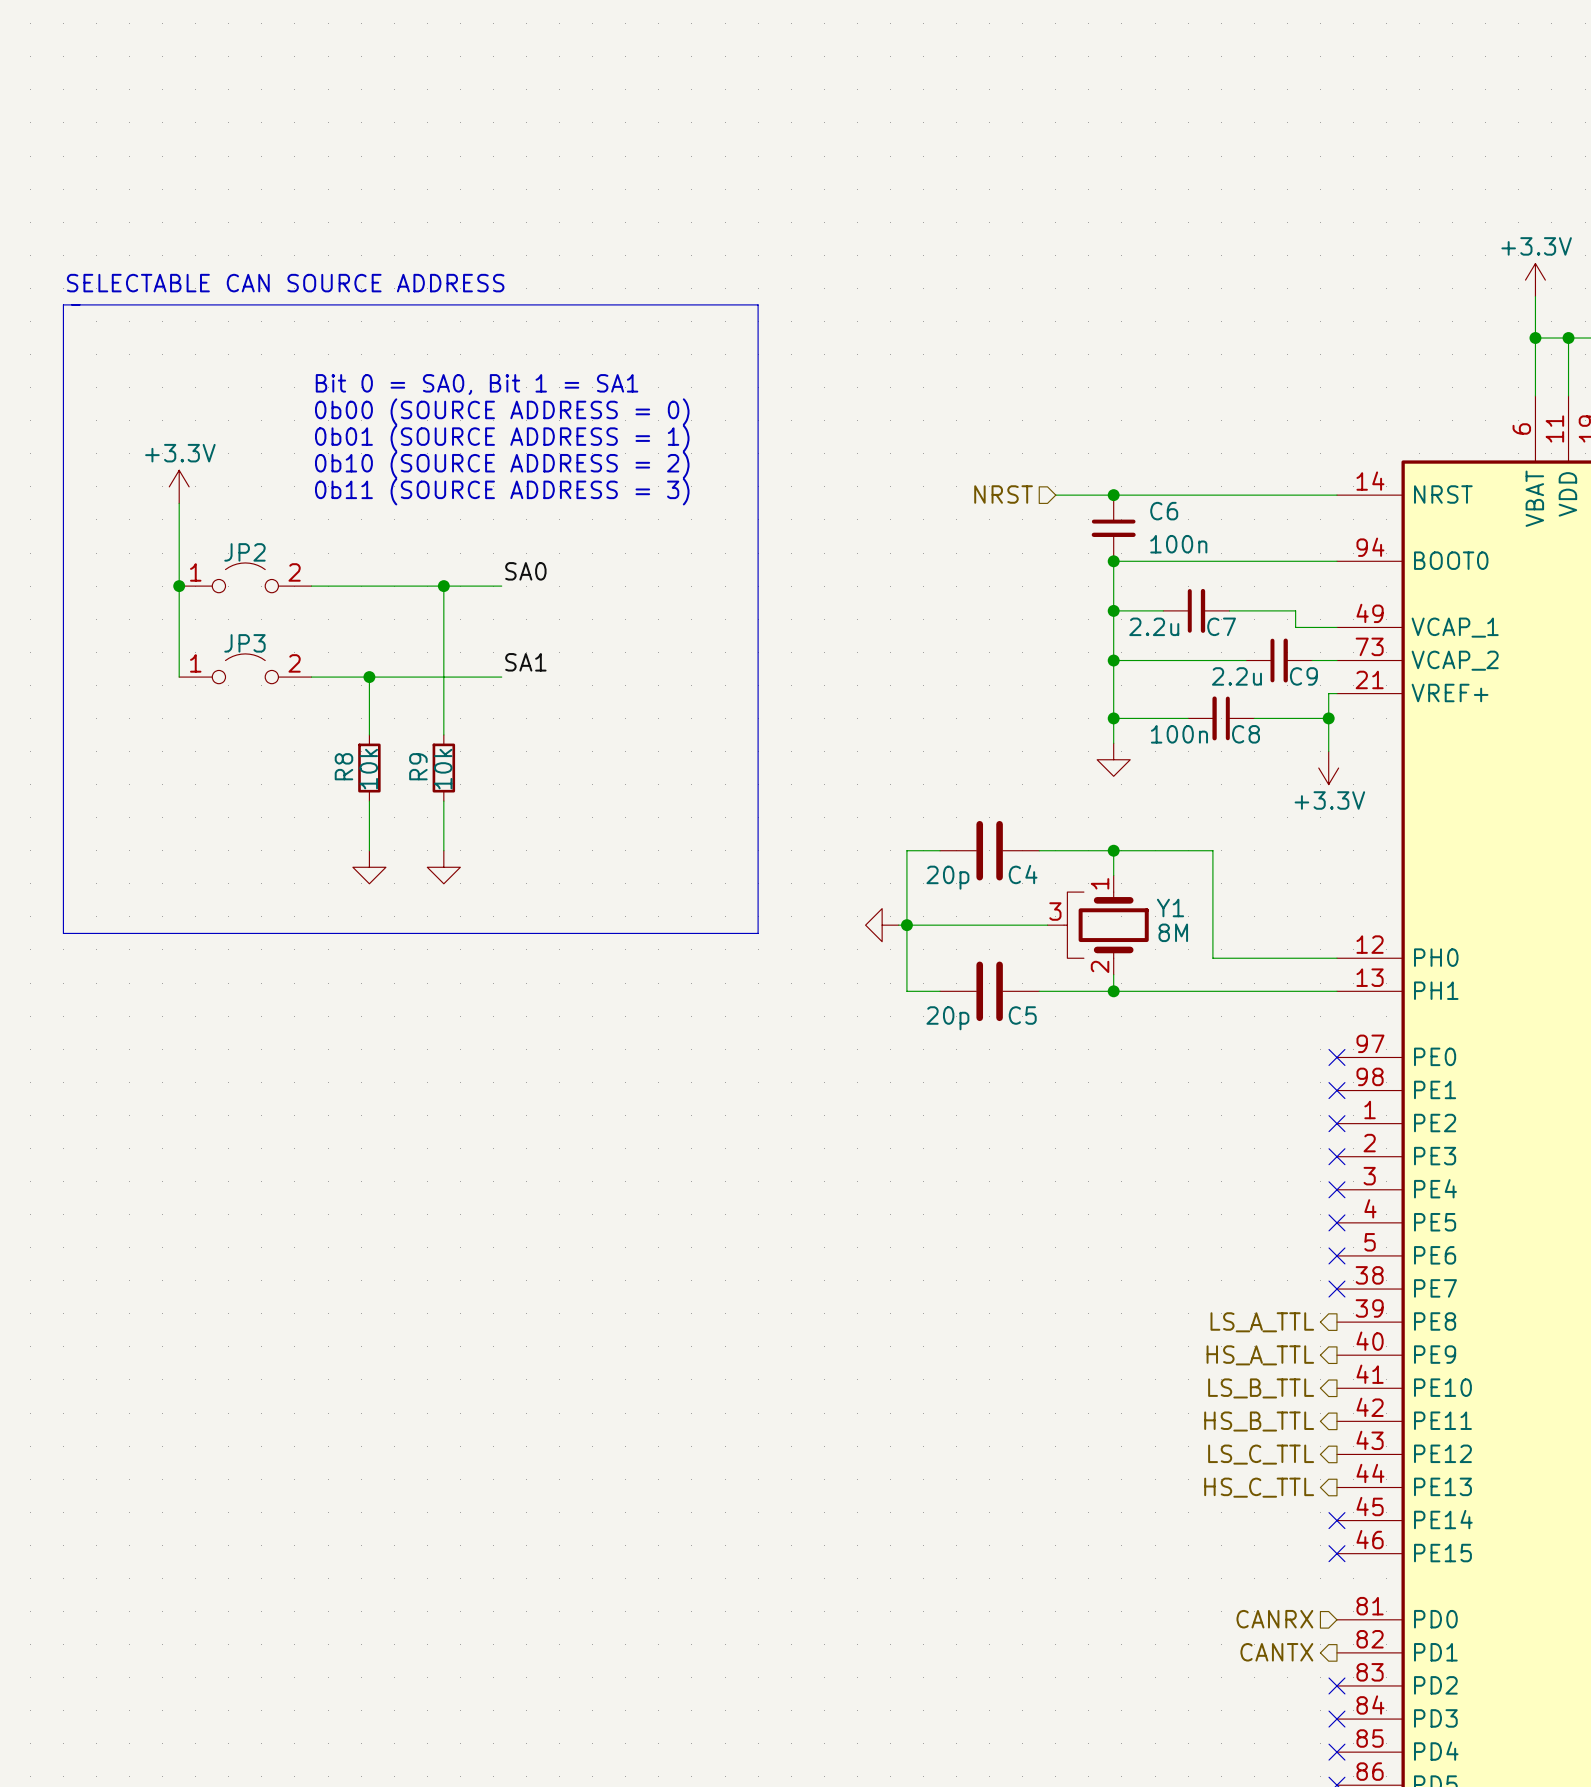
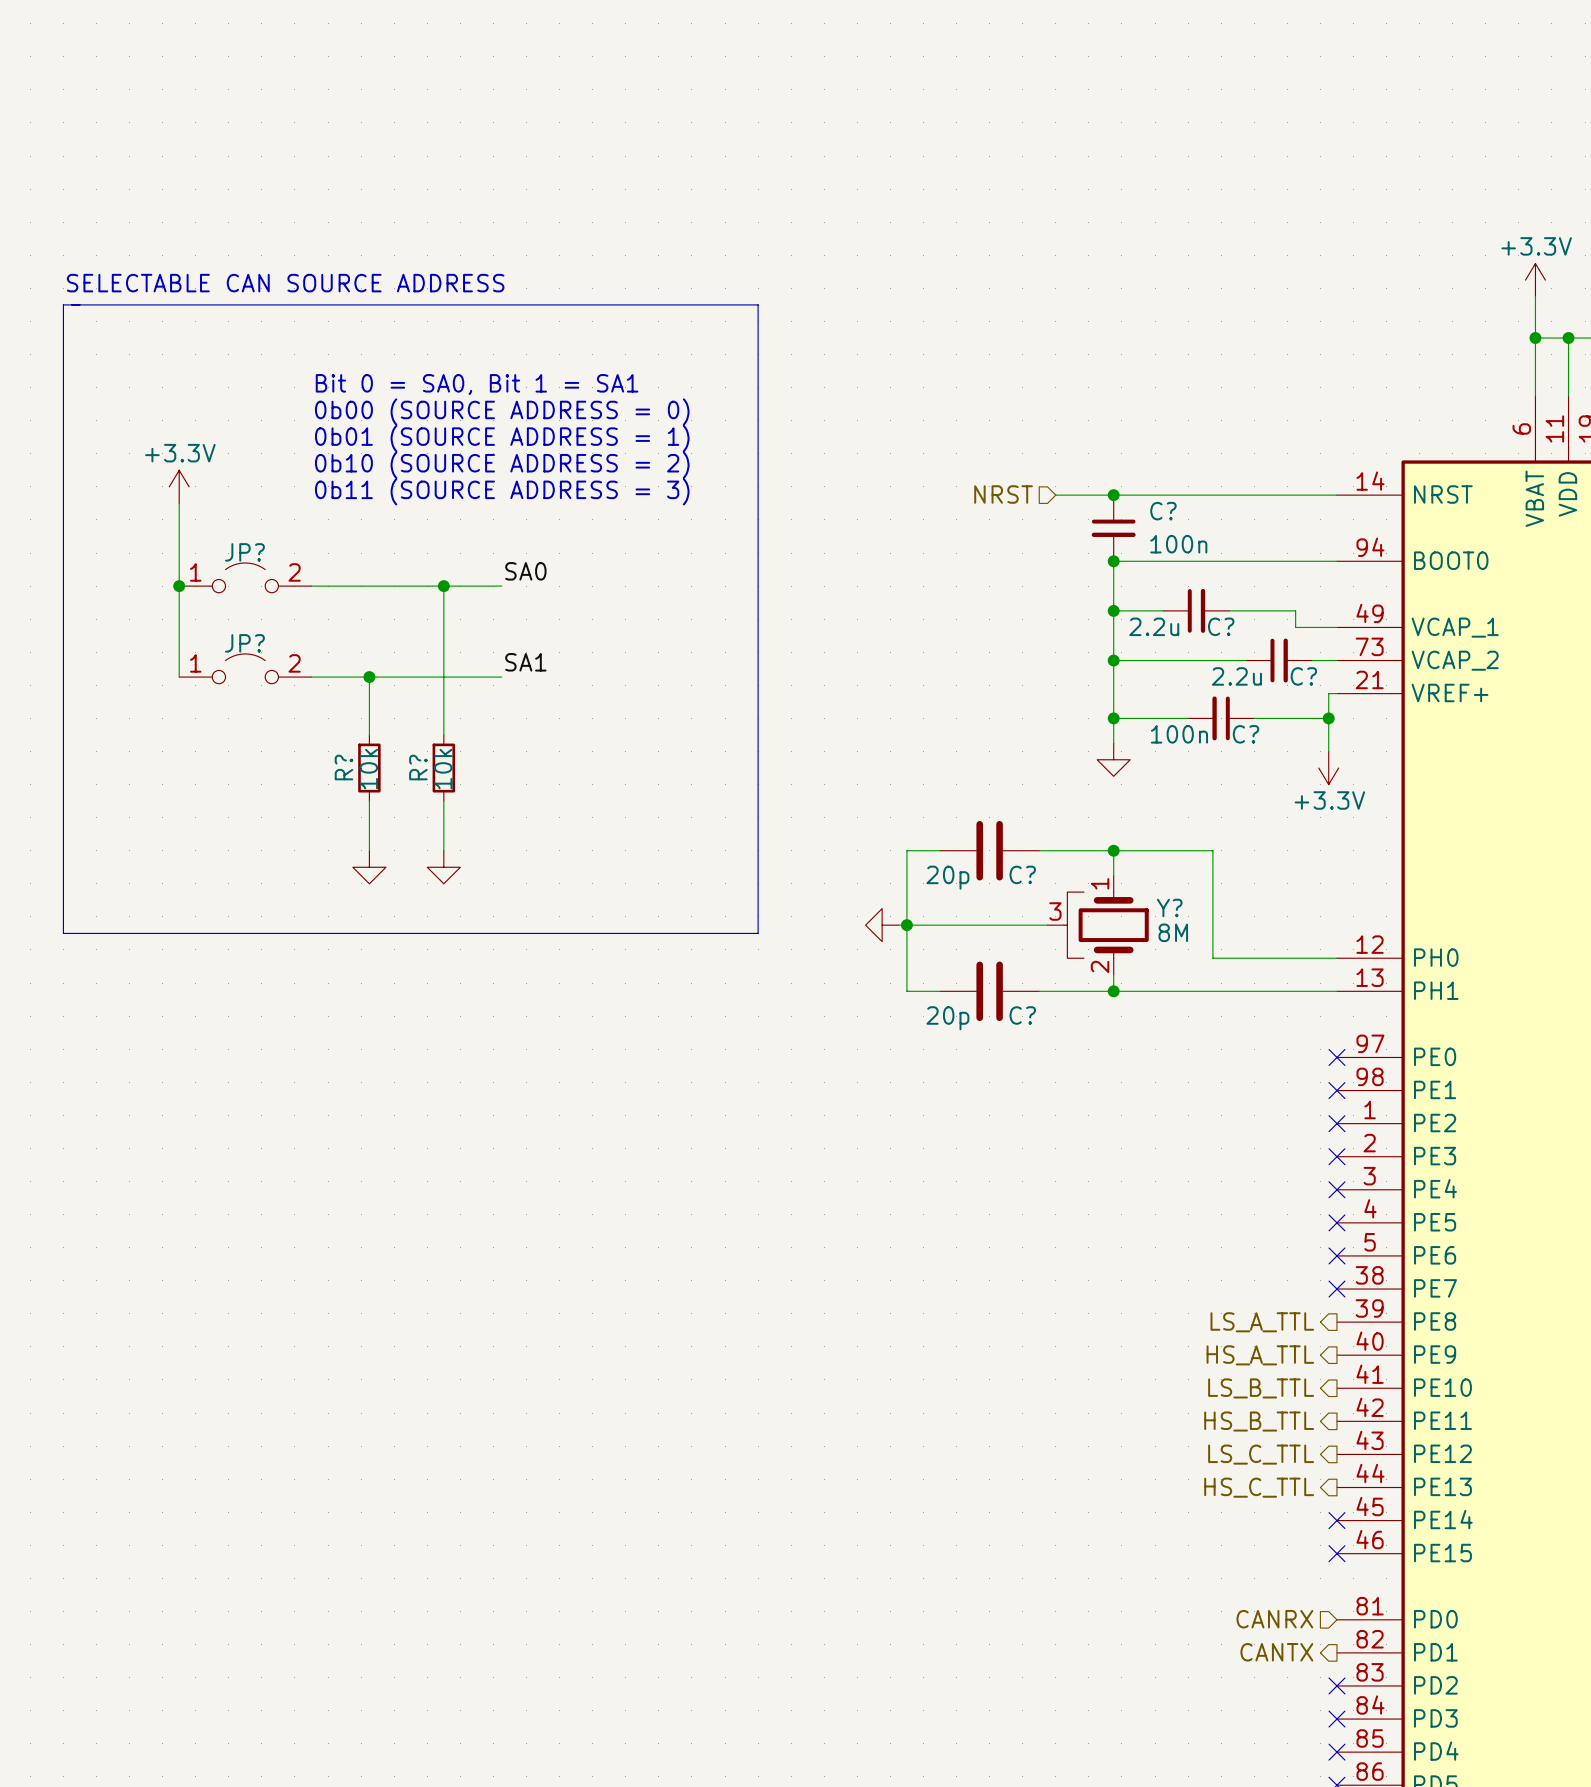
C6 name: C6 (1164, 511) -> C? (1163, 511)
JP2 name: JP2 (244, 552) -> JP? (244, 552)
C7 name: C7 (1221, 626) -> C? (1221, 626)
JP3 name: JP3 (244, 643) -> JP? (244, 643)
C9 name: C9 (1303, 676) -> C? (1303, 676)
C8 name: C8 (1246, 734) -> C? (1246, 734)
R8 name: R8 (343, 766) -> R? (343, 767)
R9 name: R9 (418, 766) -> R? (418, 767)
C4 name: C4 (1023, 874) -> C? (1022, 874)
Y1 name: Y1 (1170, 908) -> Y? (1169, 908)
C5 name: C5 (1022, 1015) -> C? (1022, 1015)

